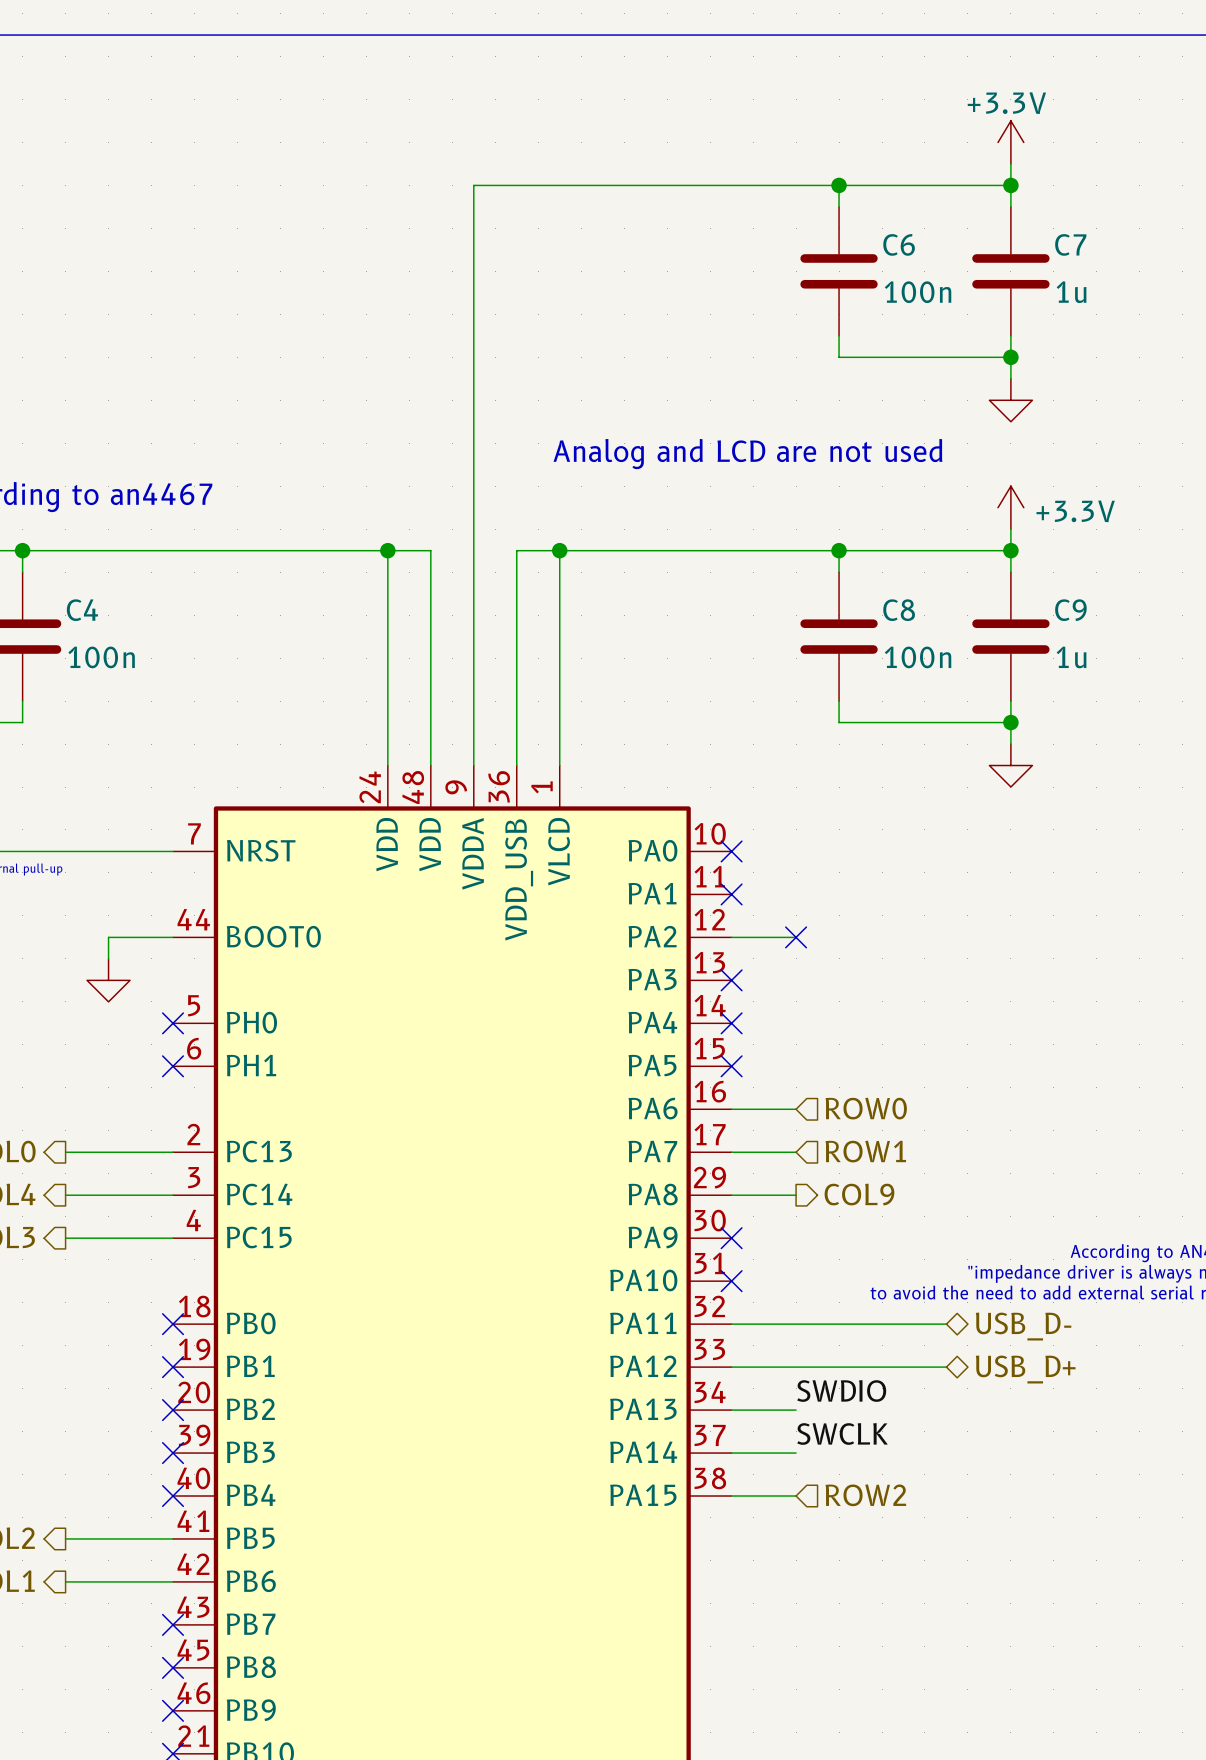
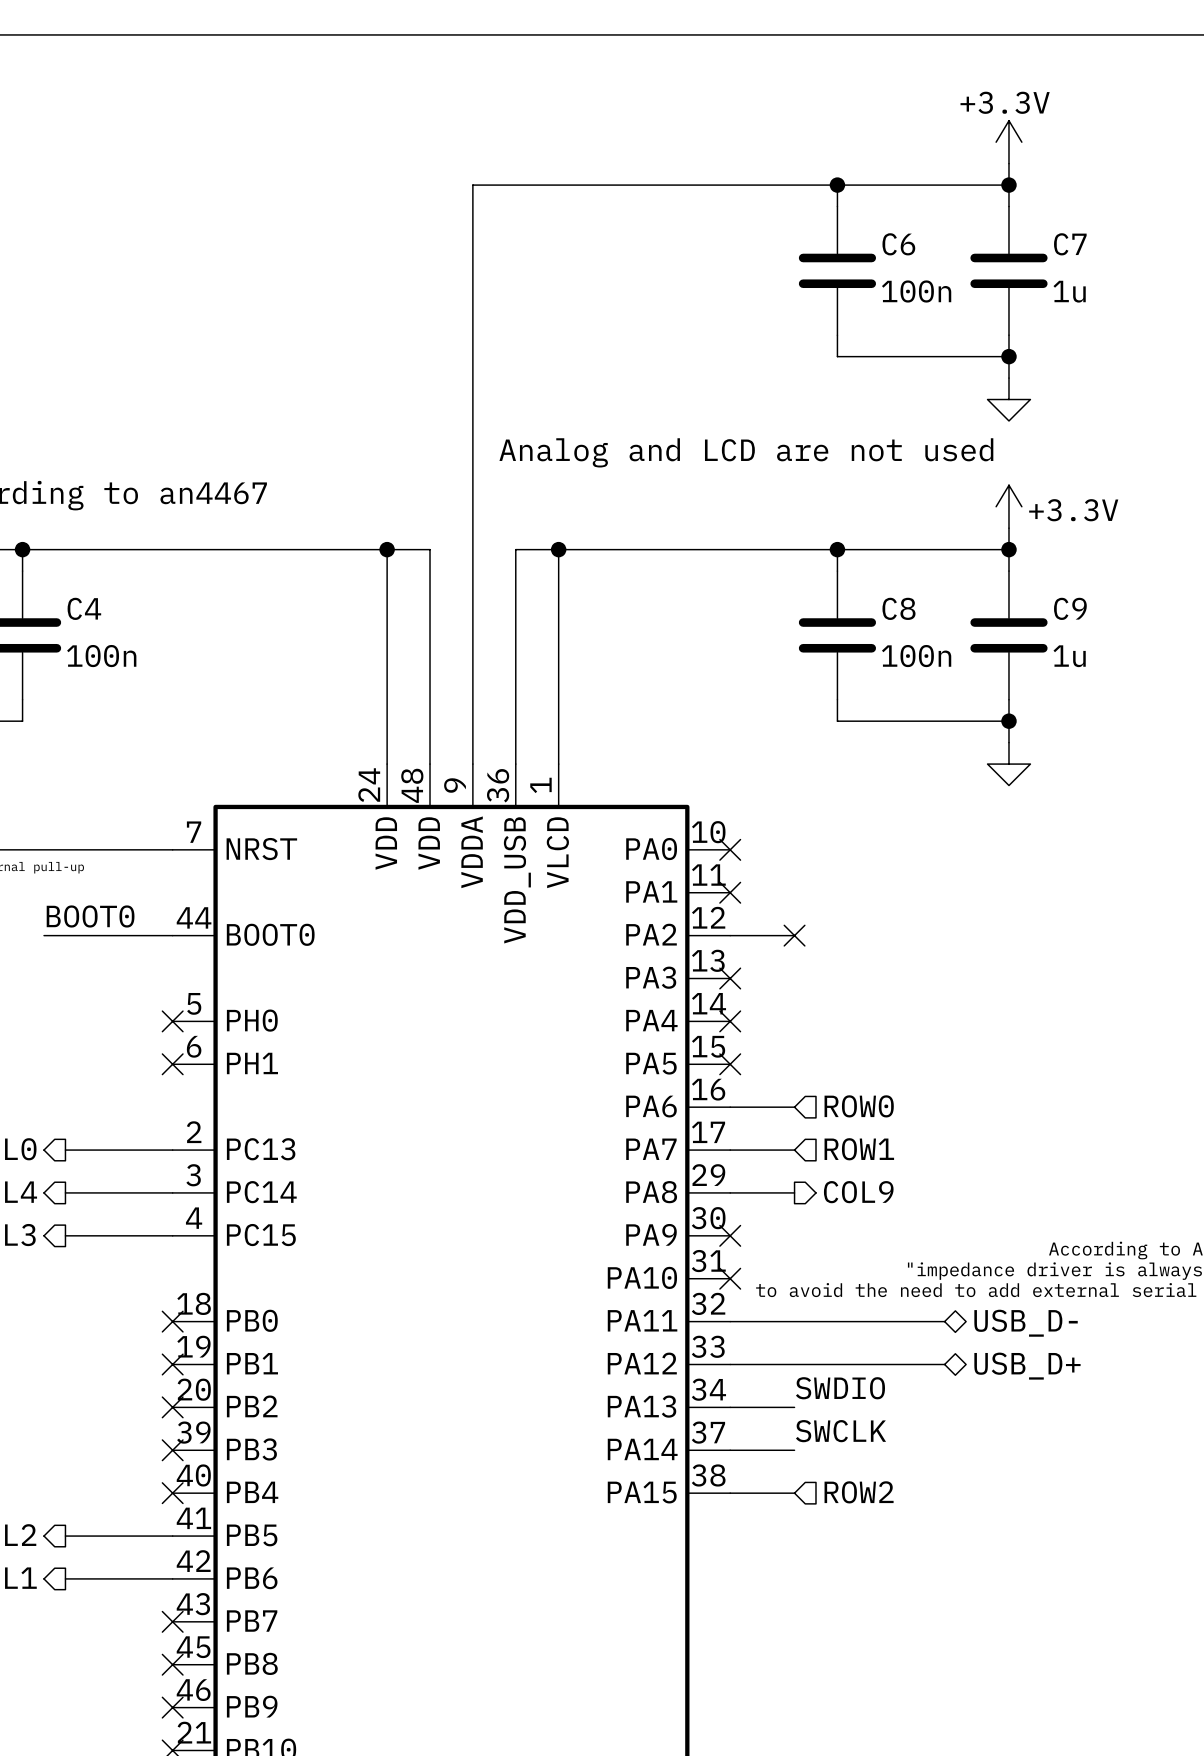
label: none -> BOOT0 (90, 916)
wire: (108, 937) (108, 958) -> (108, 935) (44, 935)
power symbol: (108, 980) -> none

